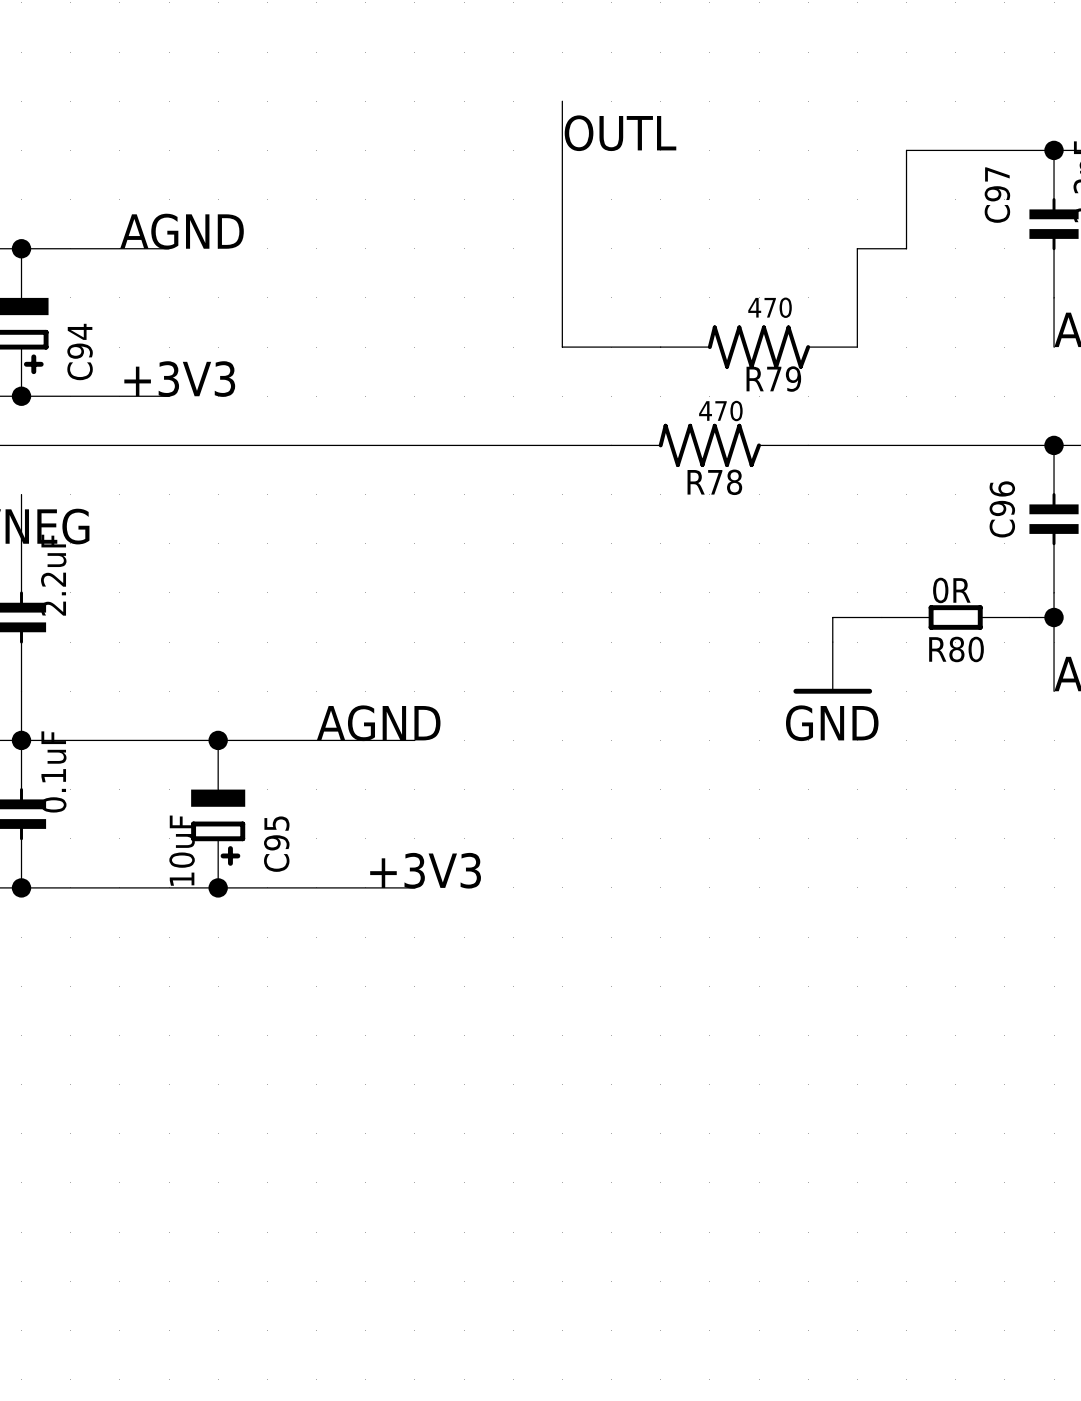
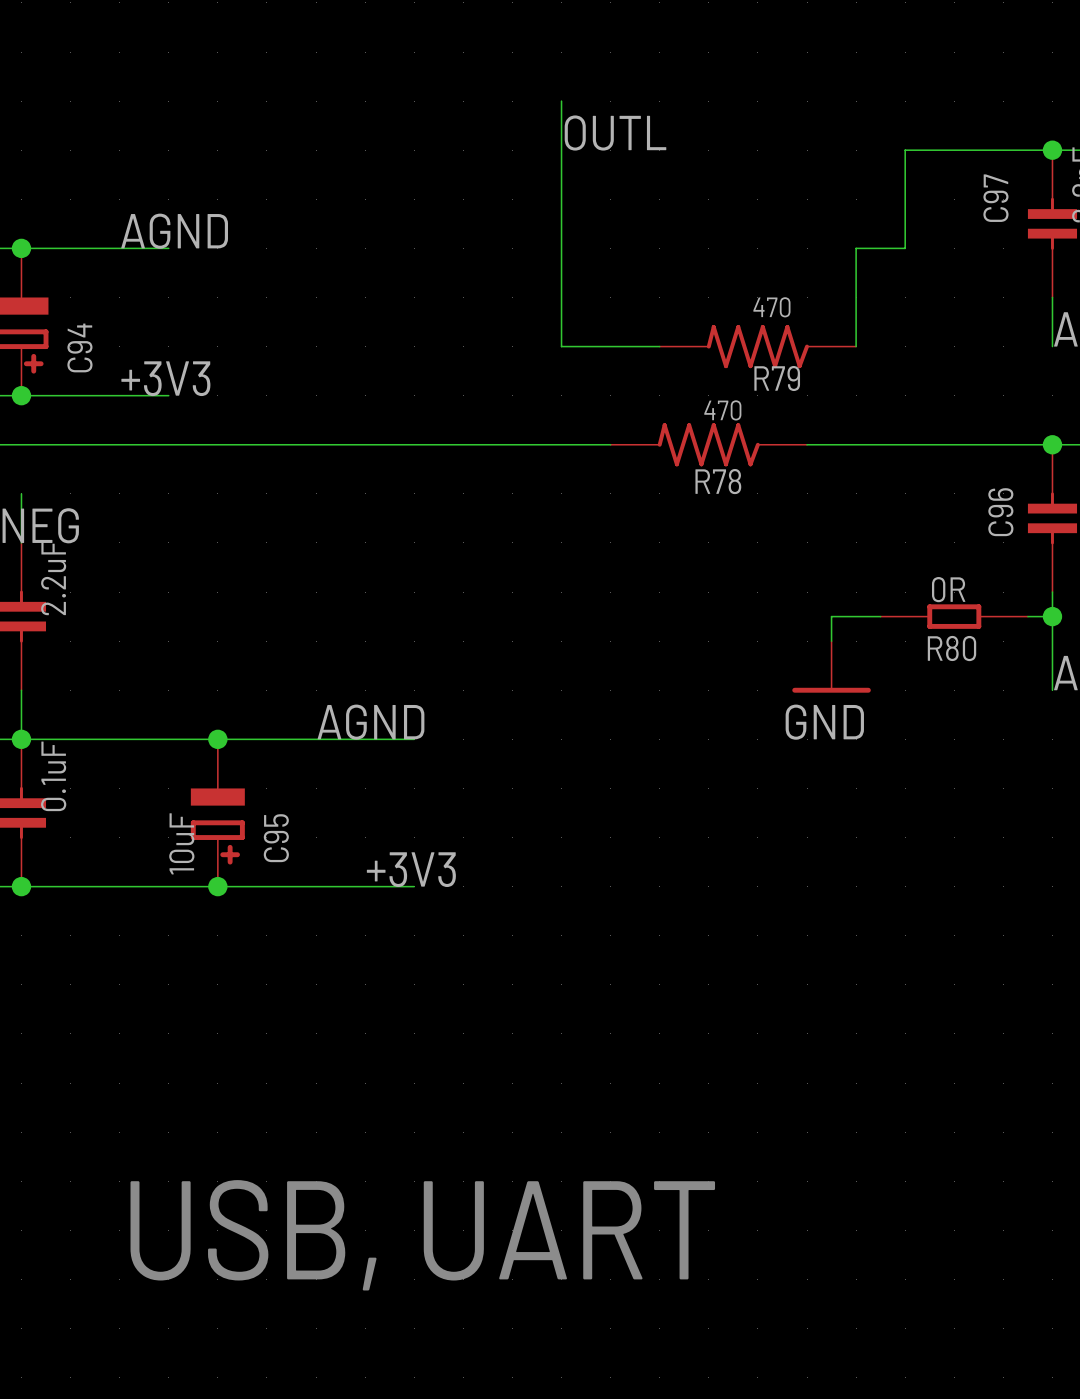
text: none -> USB, UART (422, 1235)

